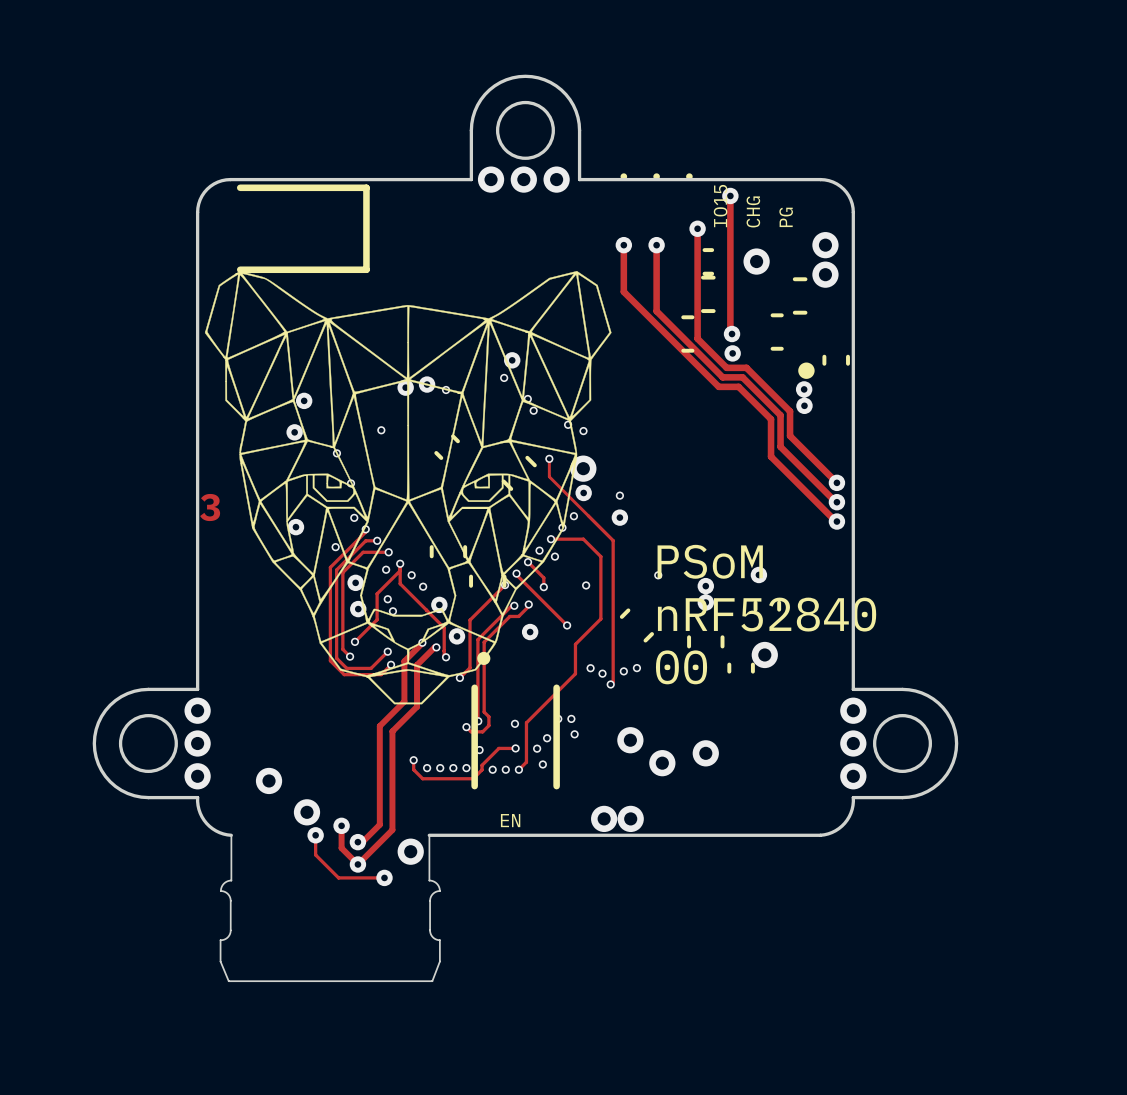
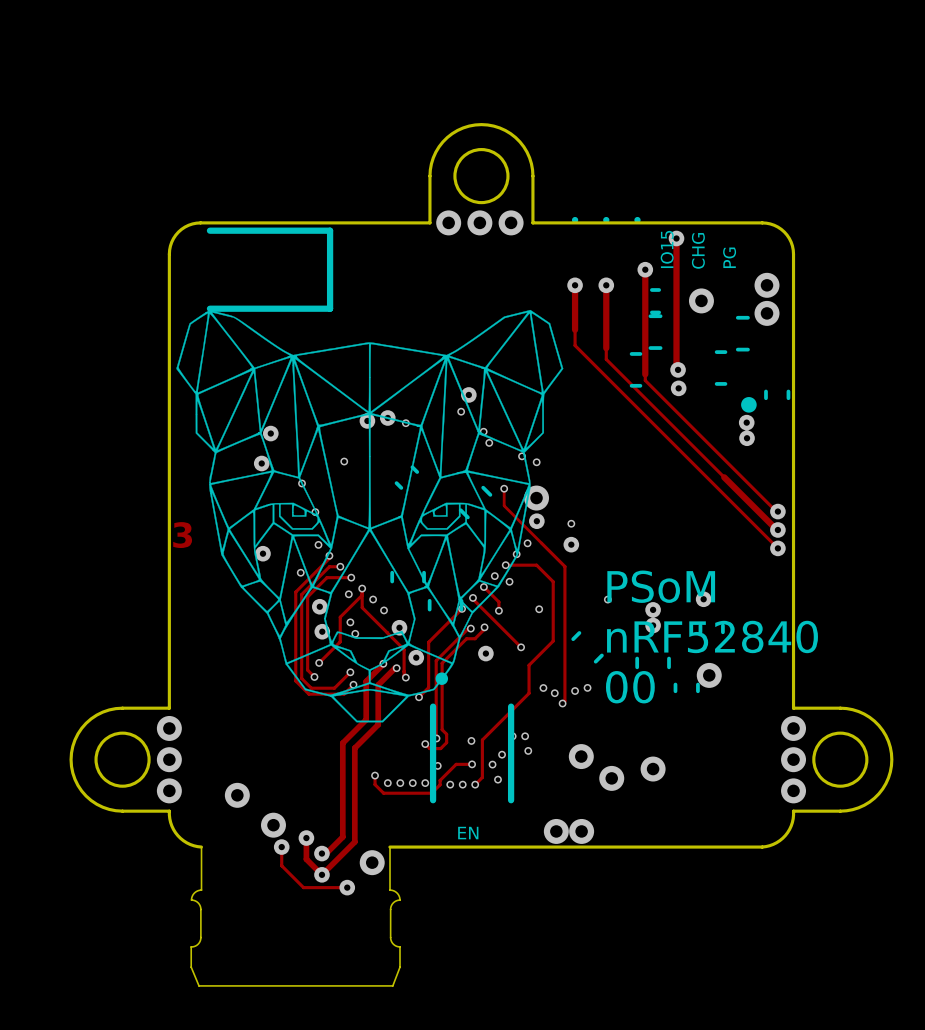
track: (623, 291) (718, 386) (738, 386) (771, 419) (771, 456) (836, 521) -> (575, 329) (575, 345) (777, 548)
track: (656, 311) (722, 377) (742, 377) (780, 415) (780, 446) -> (606, 348) (606, 359) (724, 477)
track: (697, 338) (726, 367) (746, 367) (790, 411) (790, 435) (836, 482) -> (645, 374) (645, 380) (777, 511)

